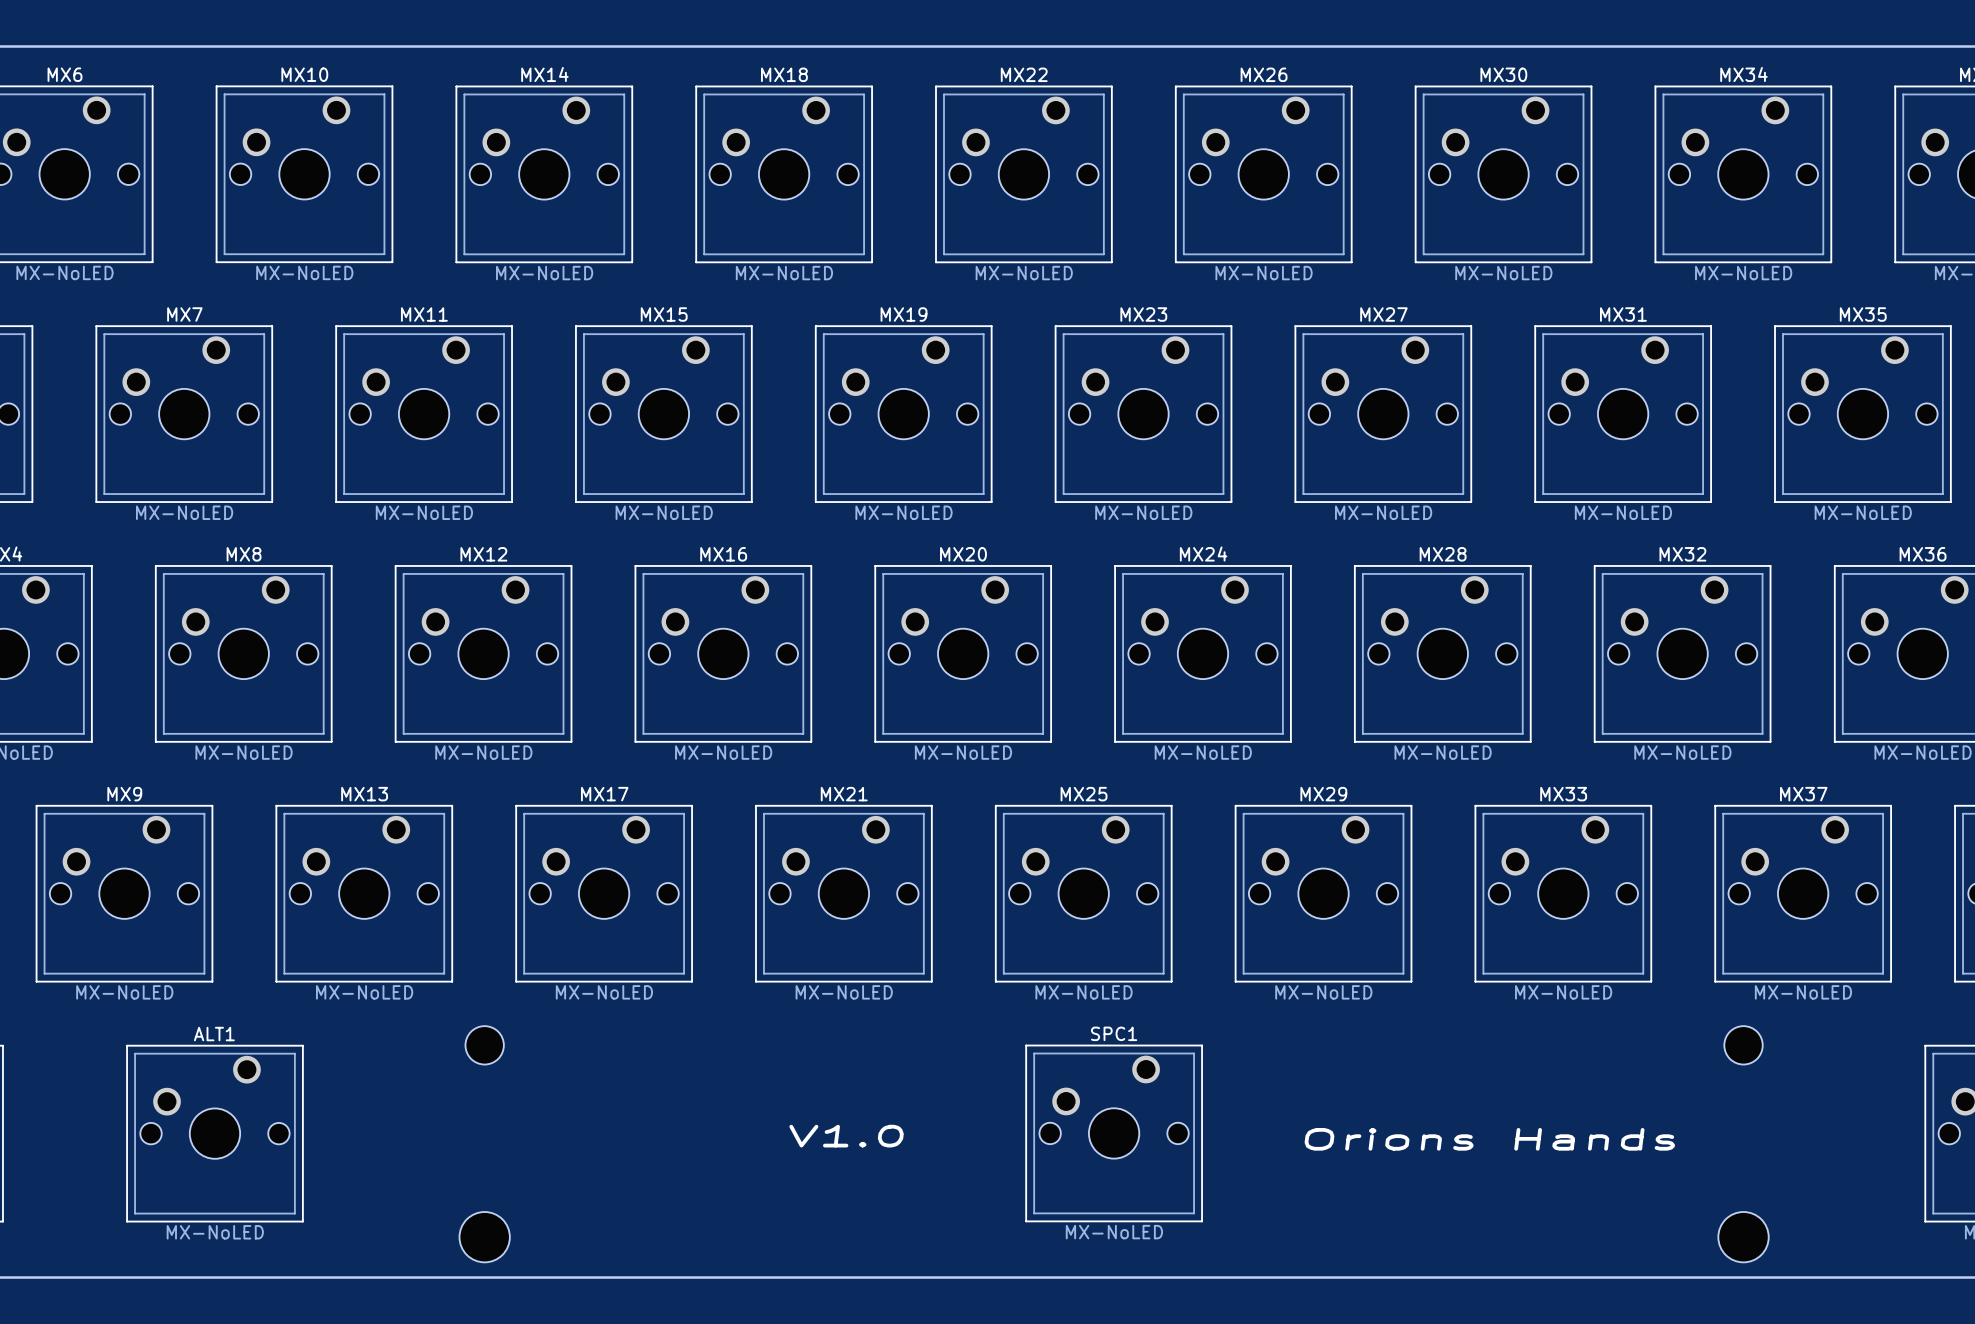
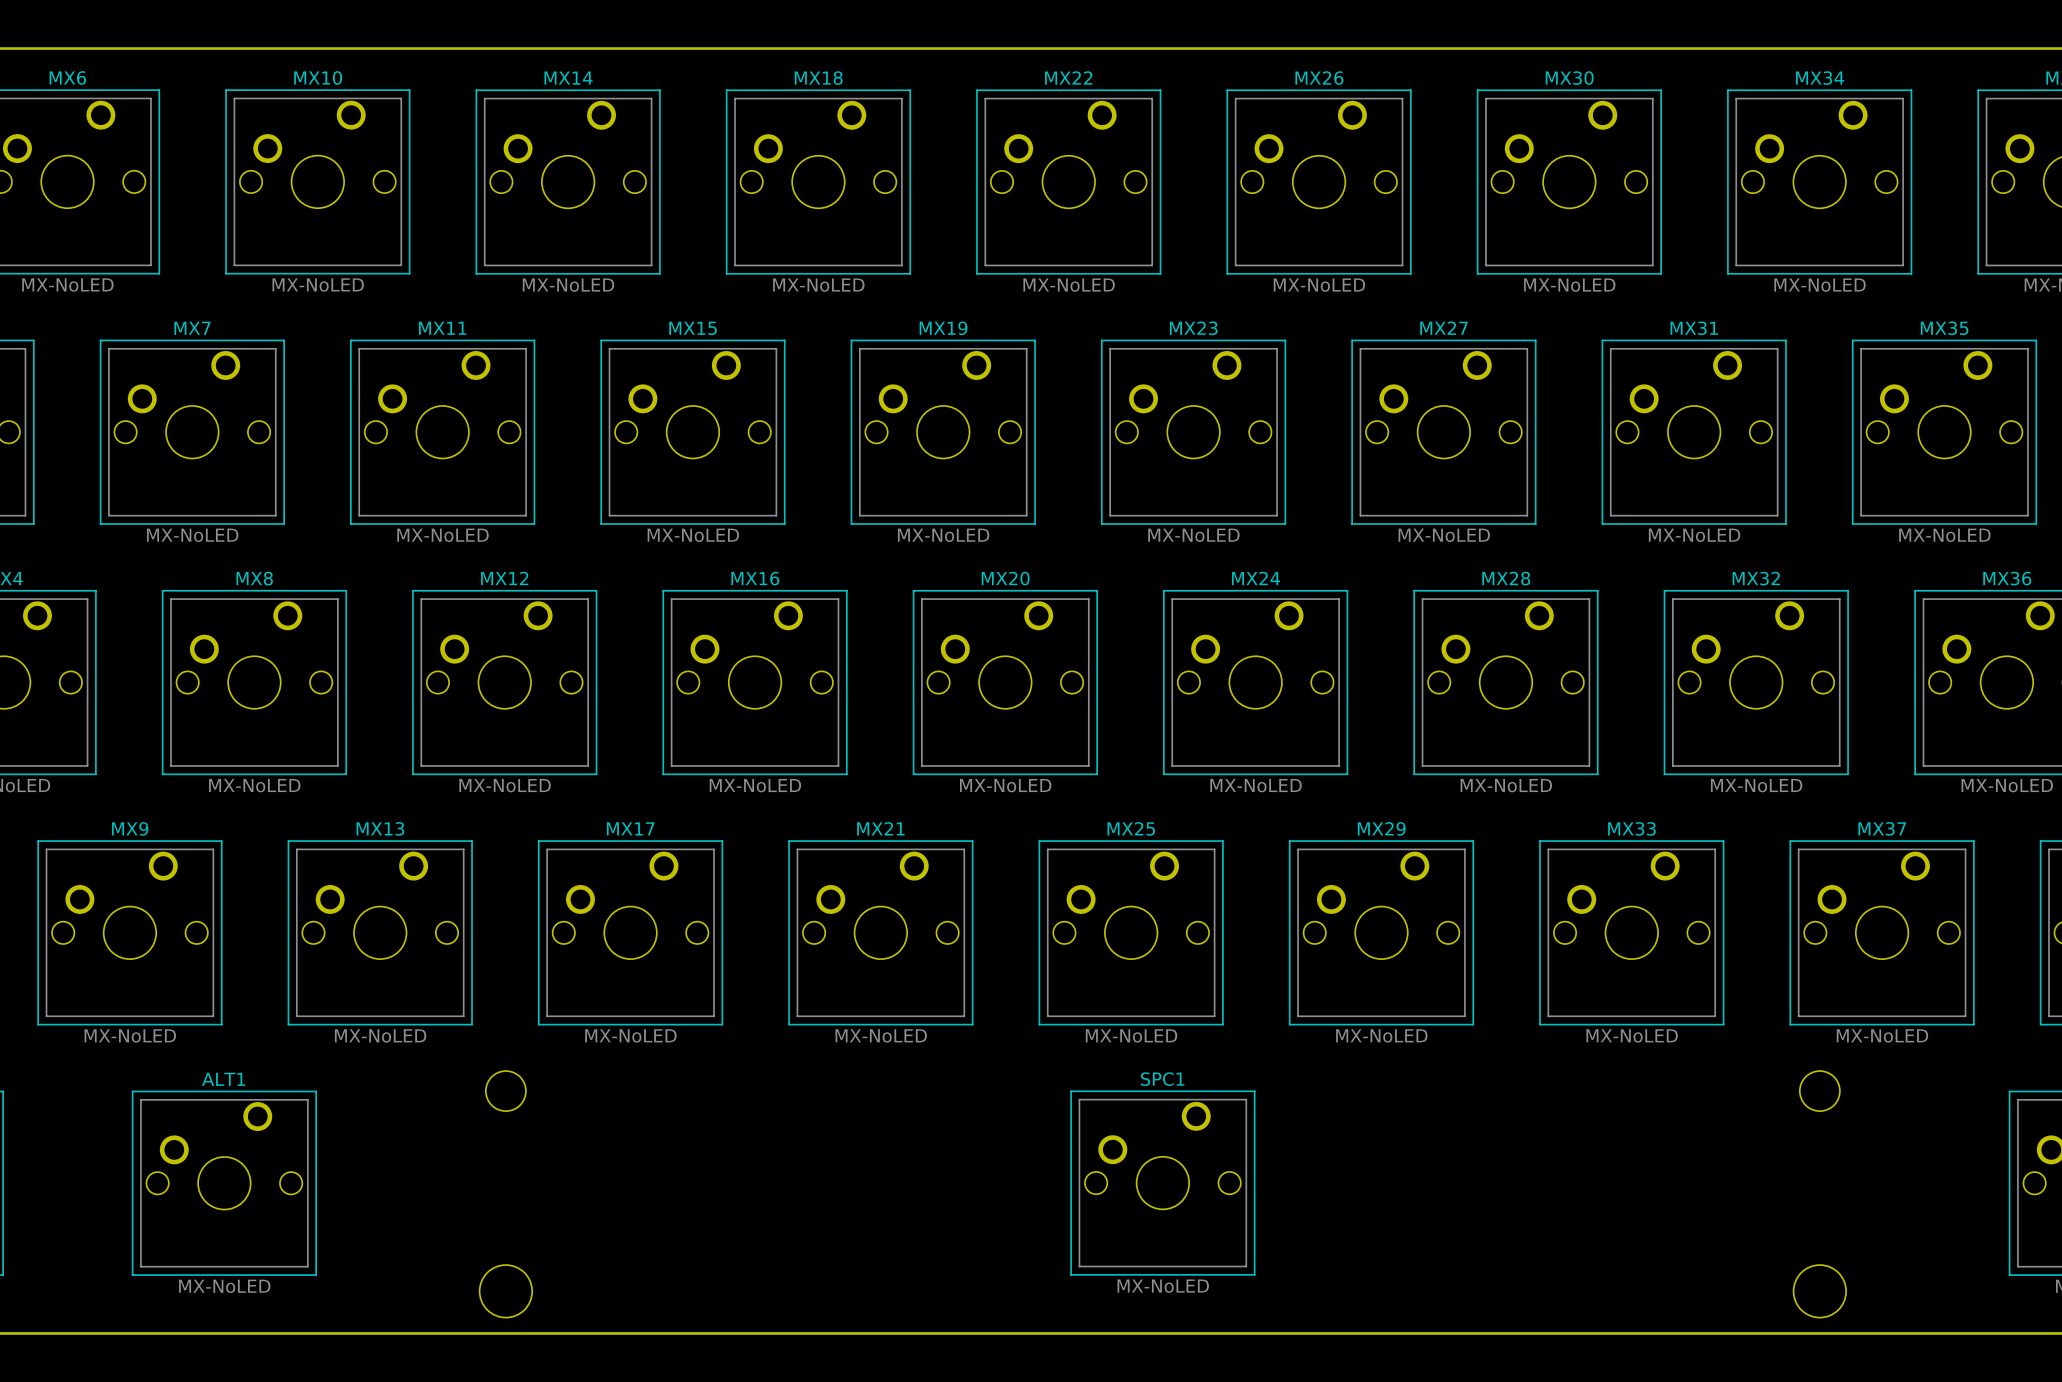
text: V1.0 (846, 1136) -> none
text: Orions Hands (1489, 1139) -> none

